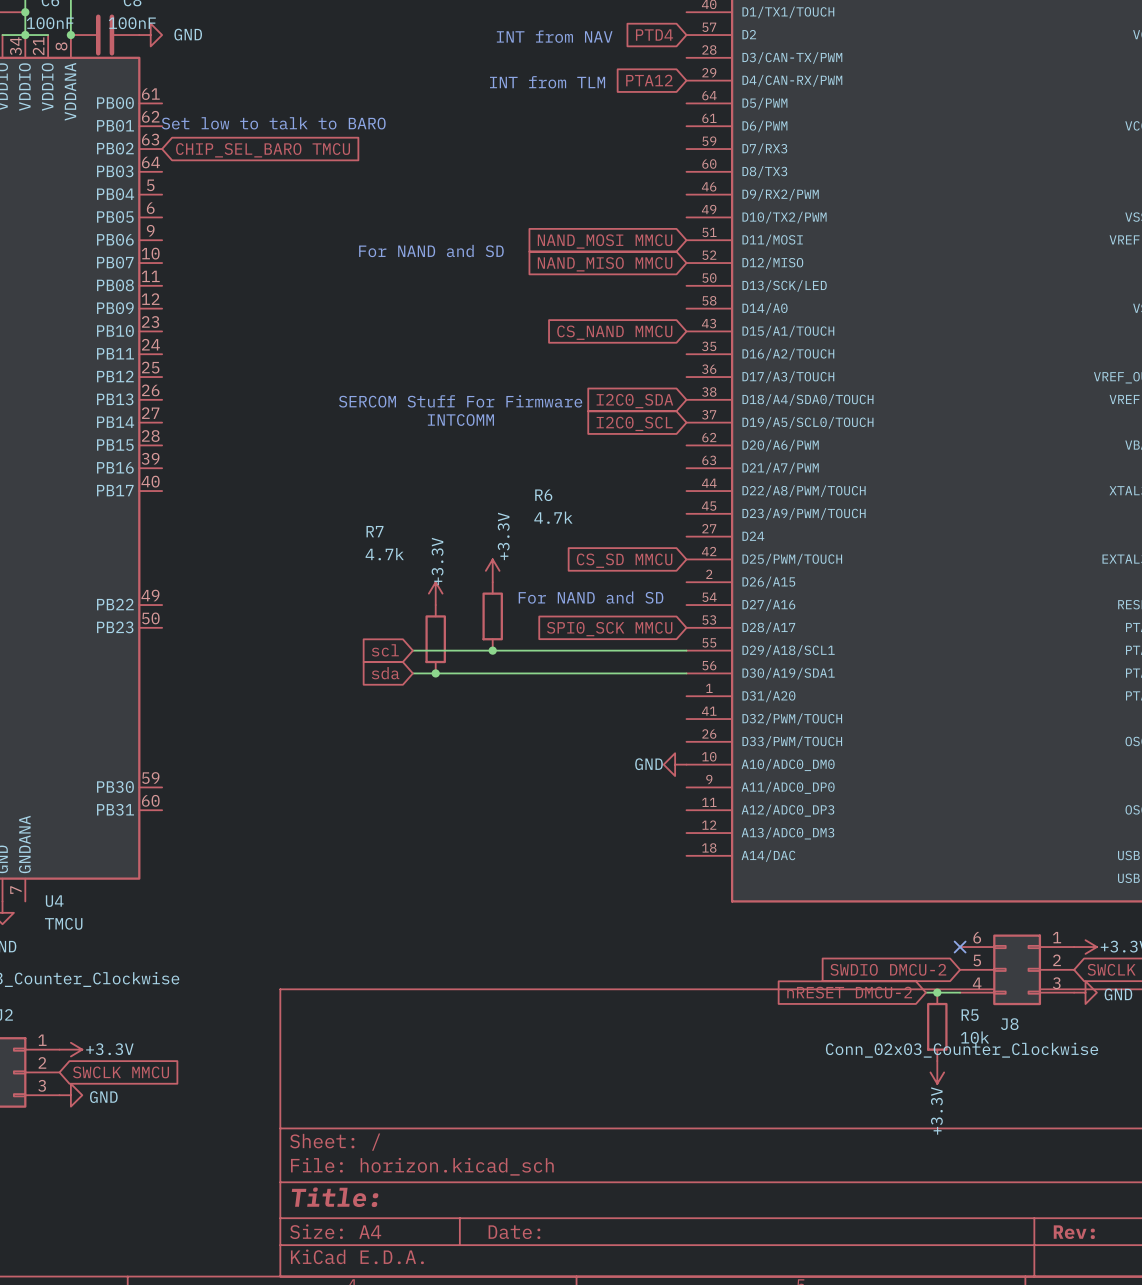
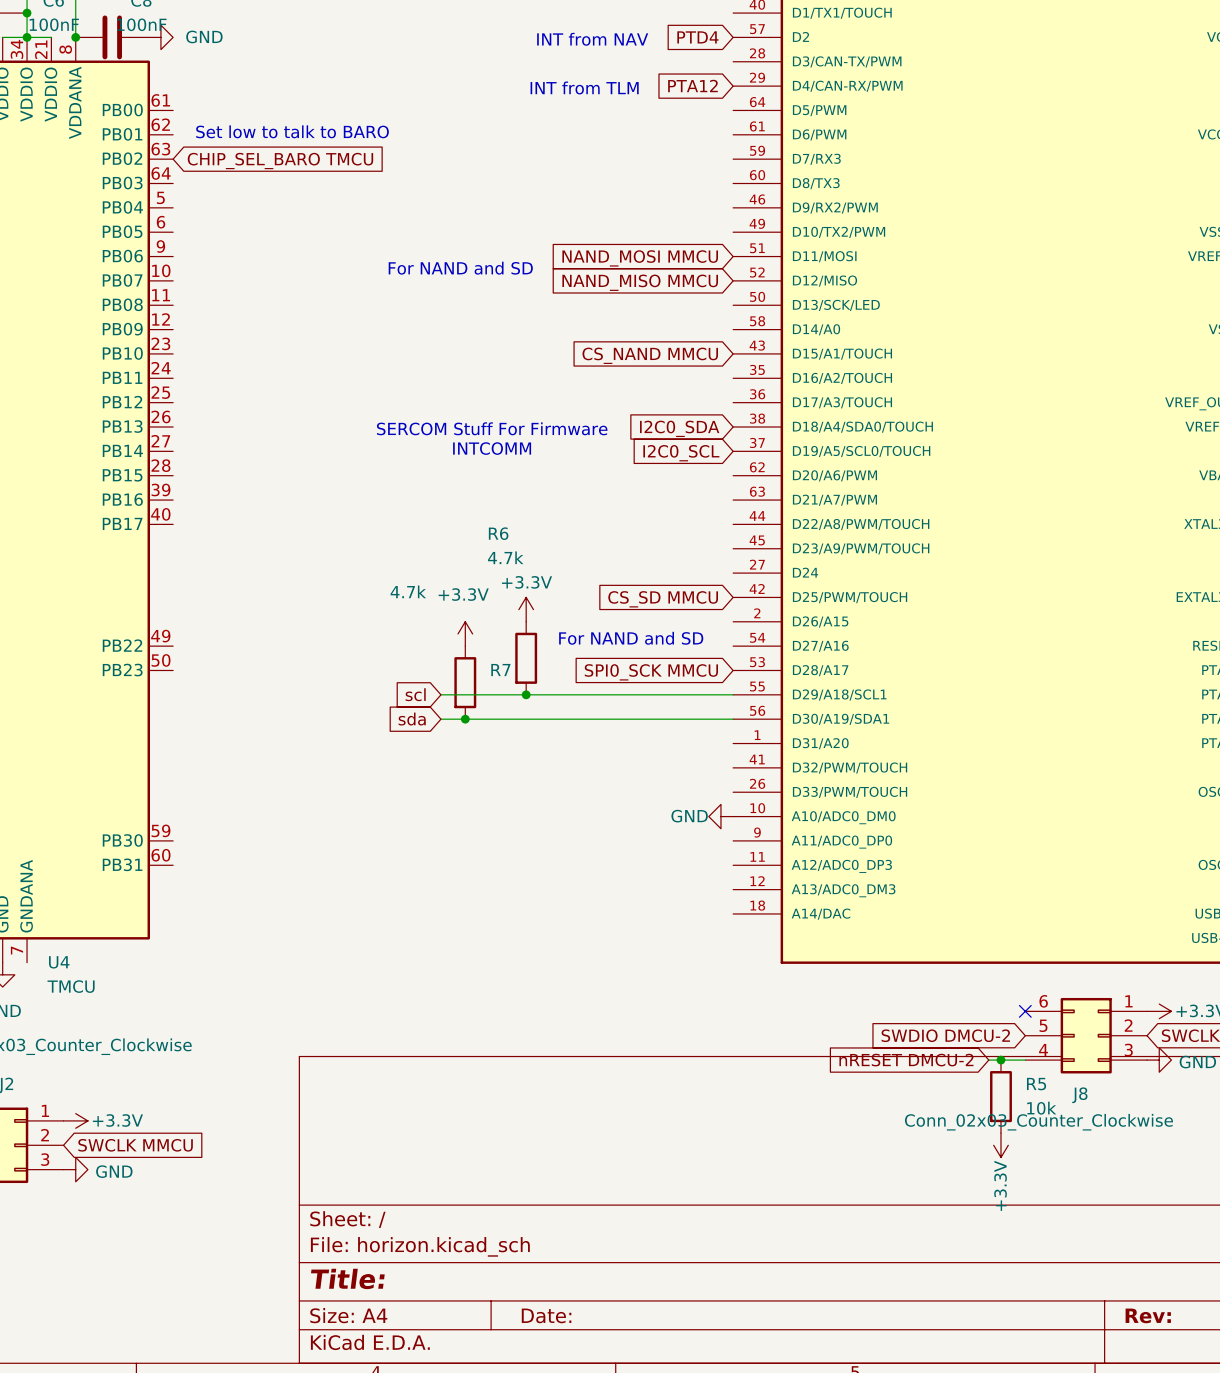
R6 name position: R6 (543, 495) -> R6 (498, 533)
R6 value position: 4.7k (553, 517) -> 4.7k (505, 557)
R7 name position: R7 (375, 531) -> R7 (500, 670)
power symbol text rotation: 0° (503, 536) -> 90° clockwise (527, 582)
power symbol text rotation: 0° (437, 561) -> 90° clockwise (463, 594)

